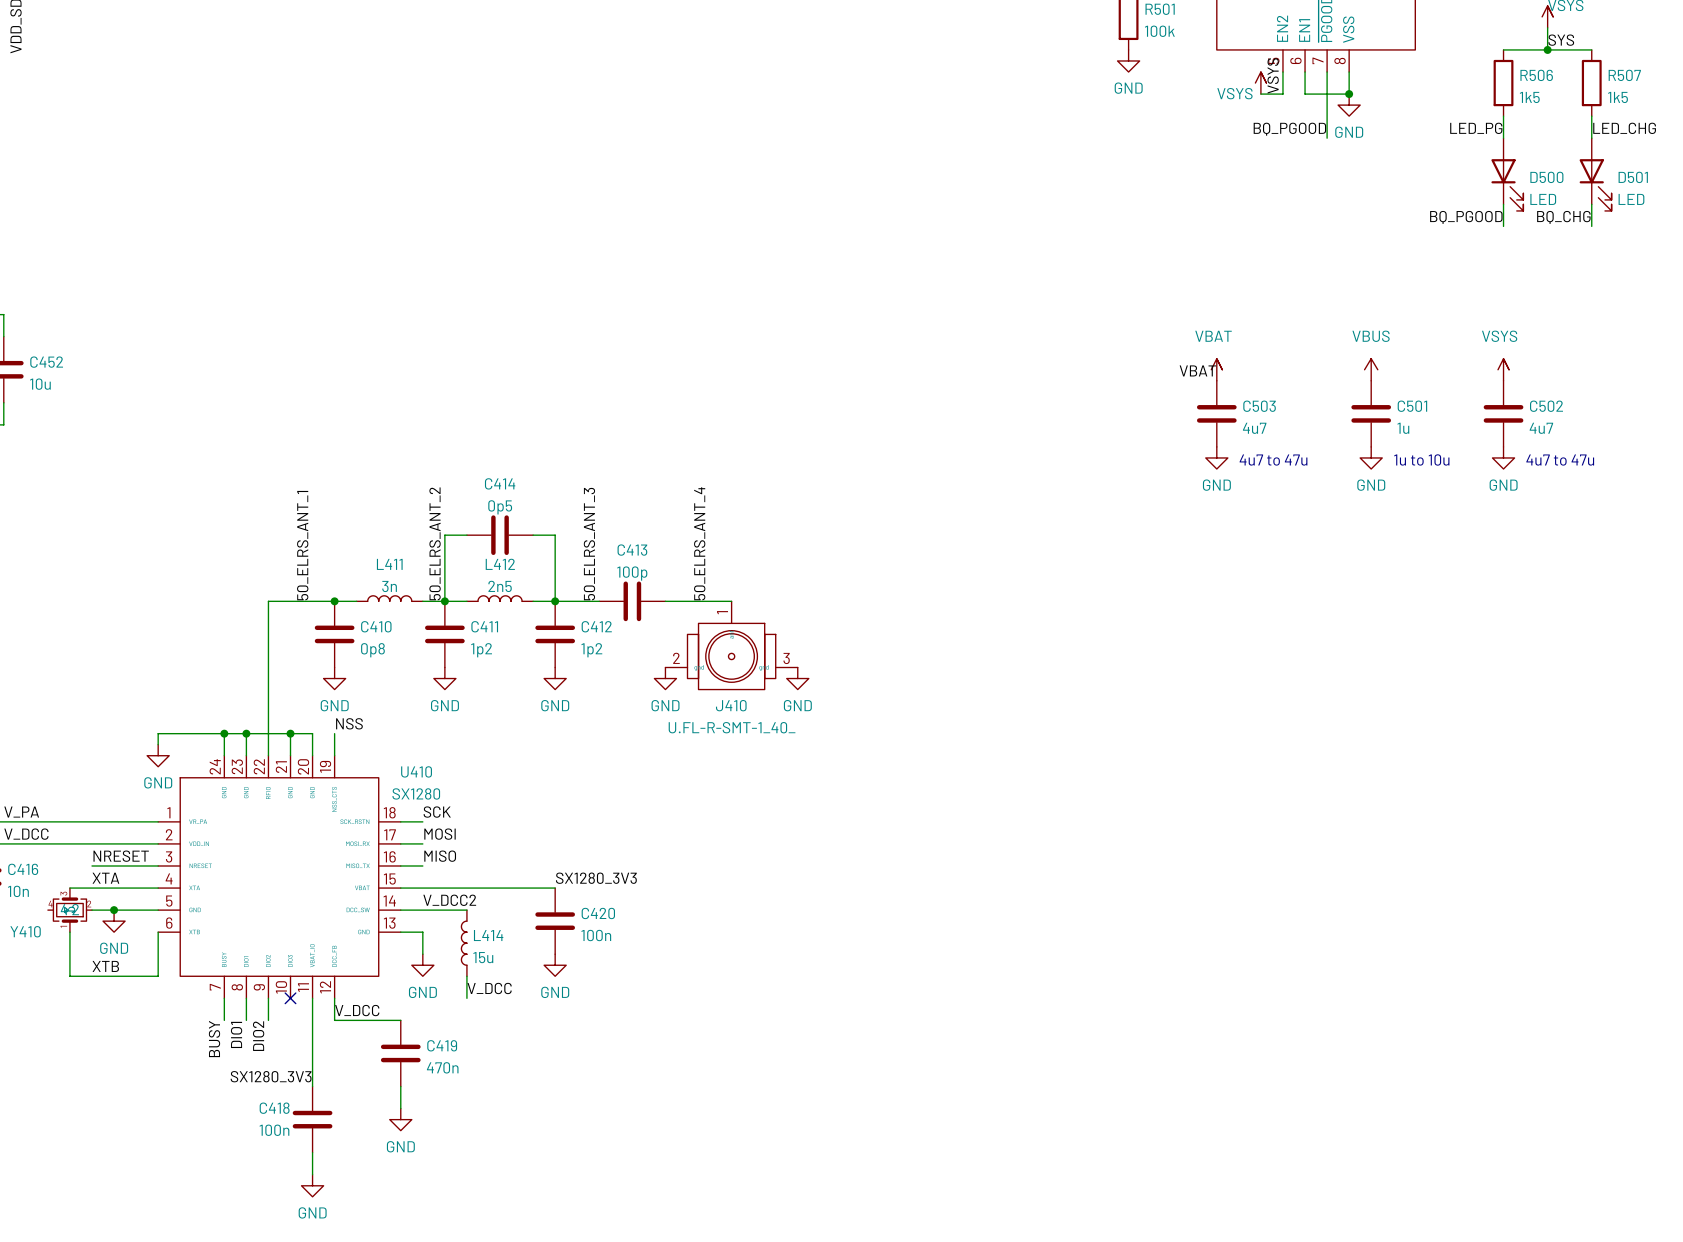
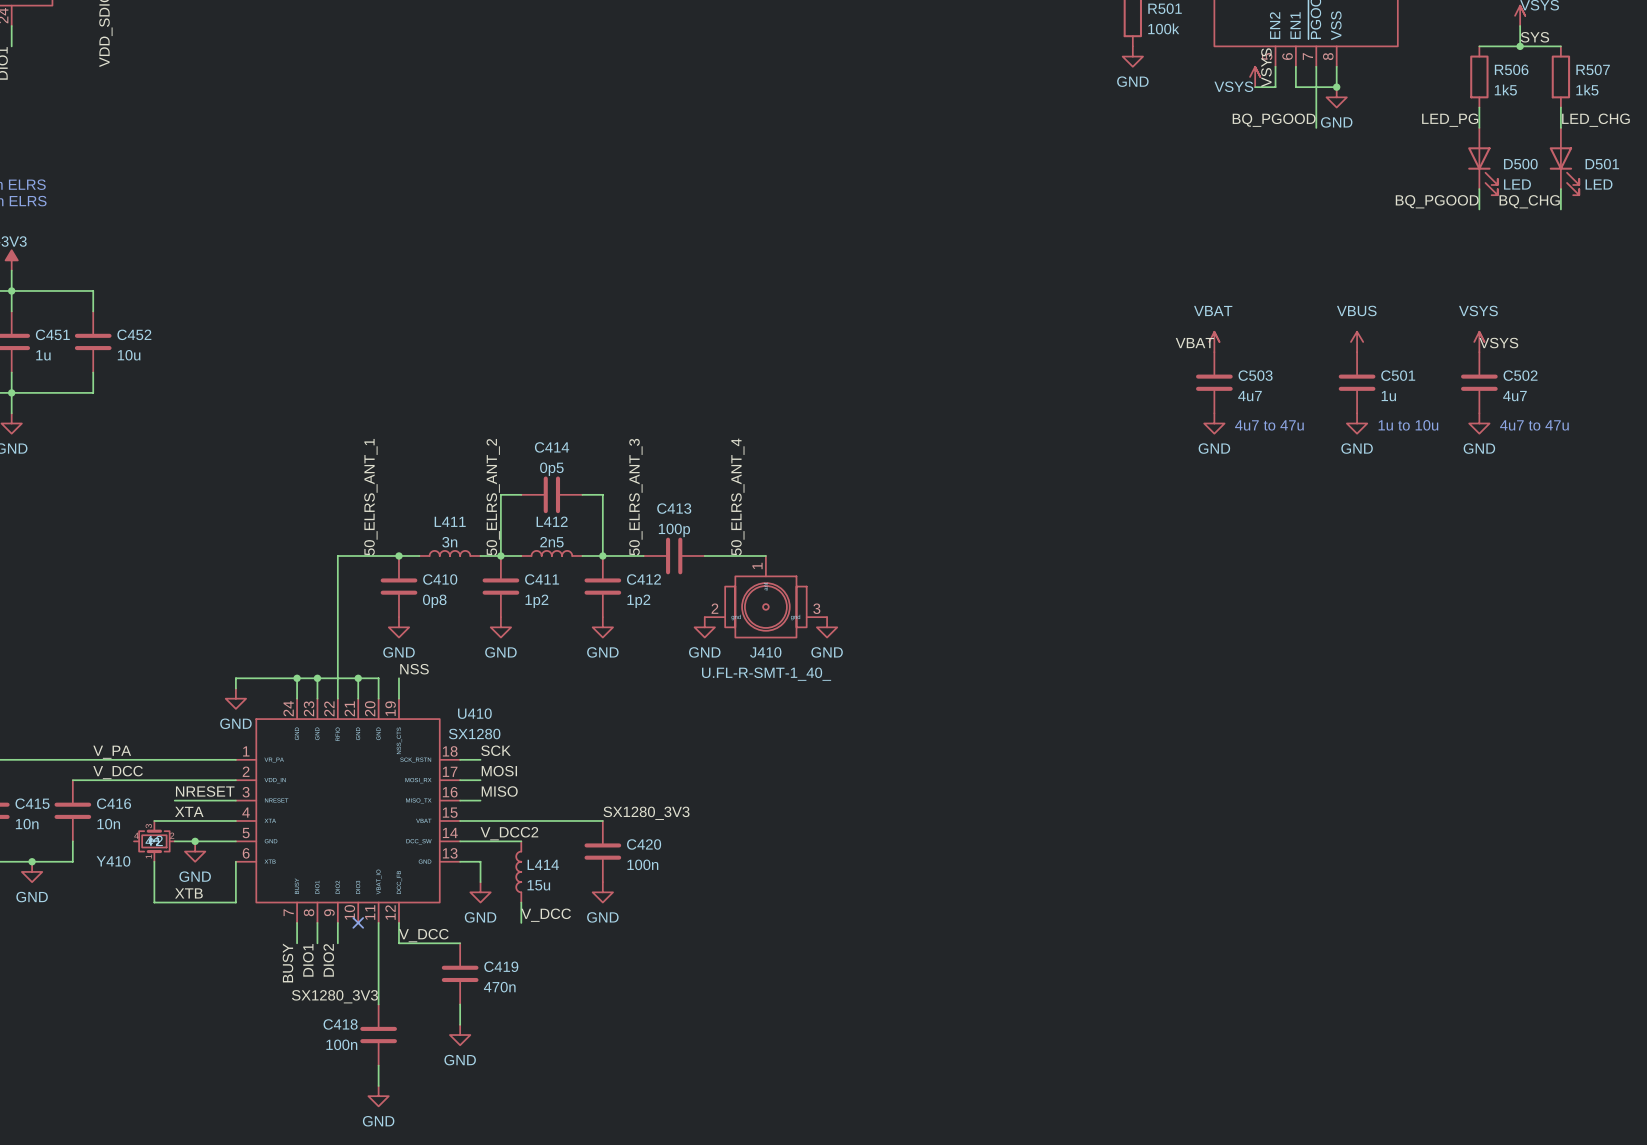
label: none -> VSYS (1498, 343)

